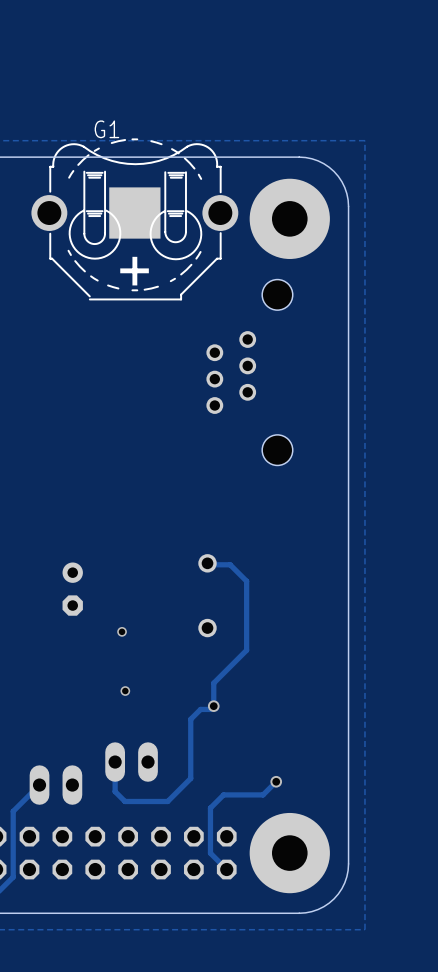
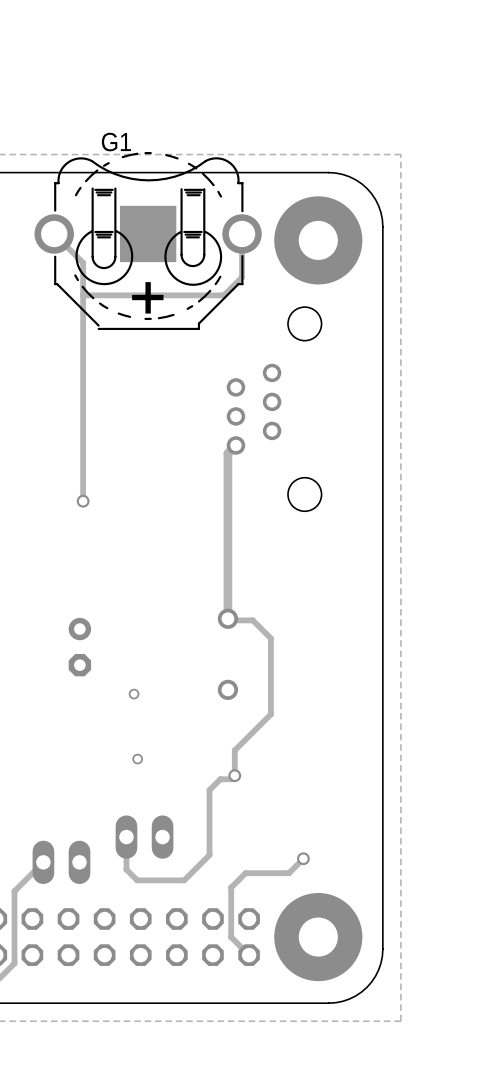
track: none -> (54, 233) (83, 262) (83, 501)
track: none -> (242, 233) (242, 277) (223, 295) (83, 295)
track: none -> (235, 445) (227, 453) (227, 618)
via: none -> (83, 501)

